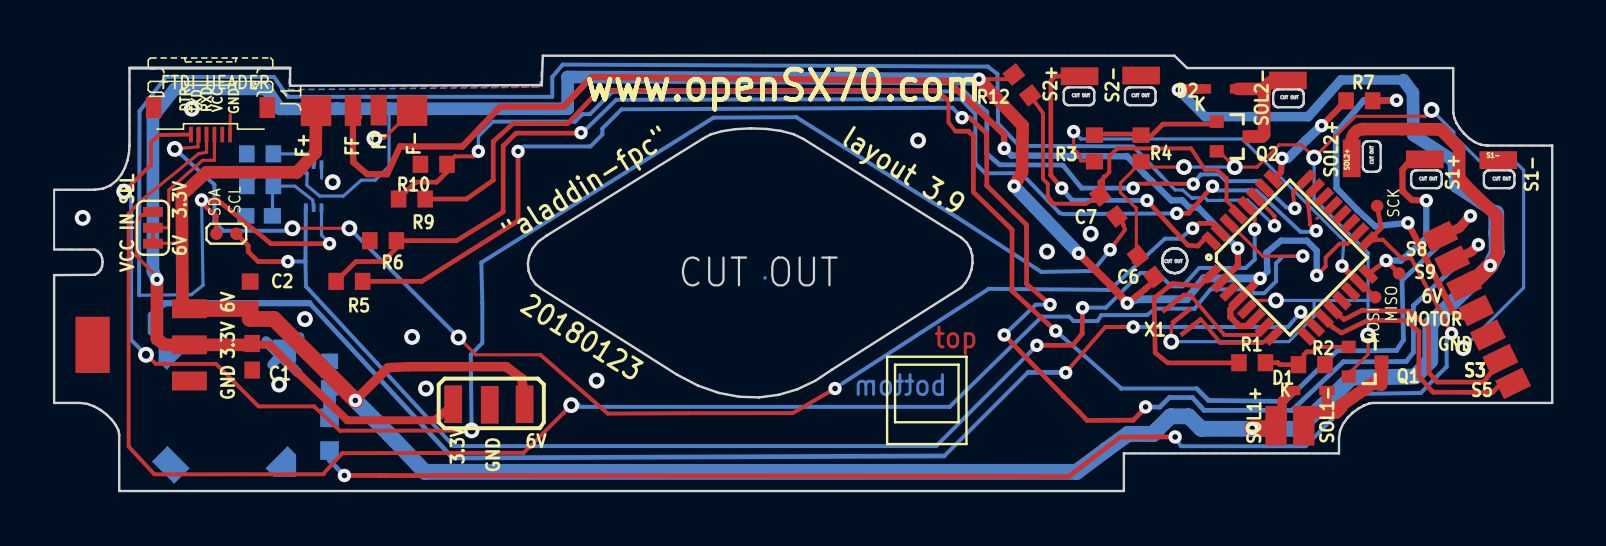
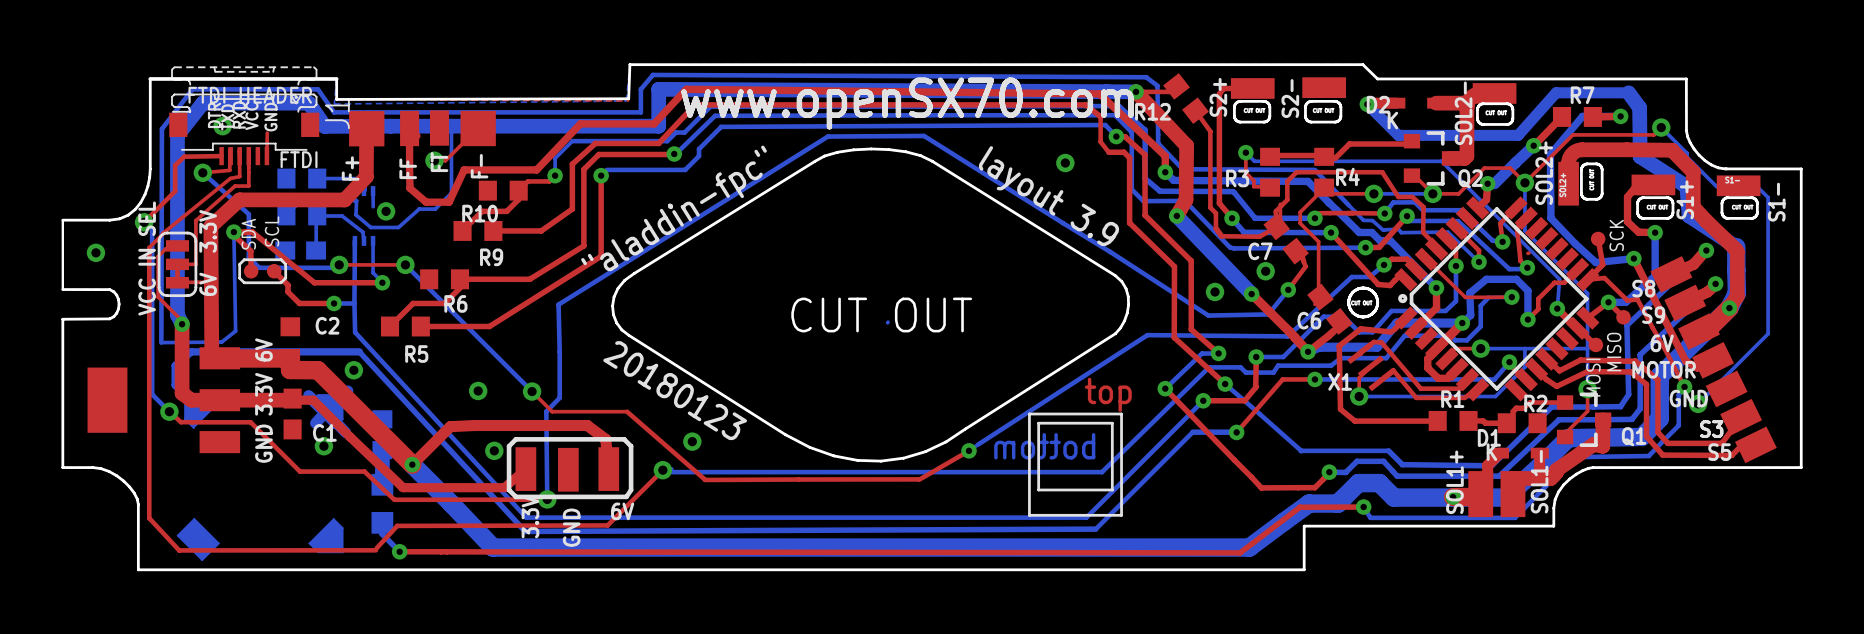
text: none -> FTDI (299, 159)

